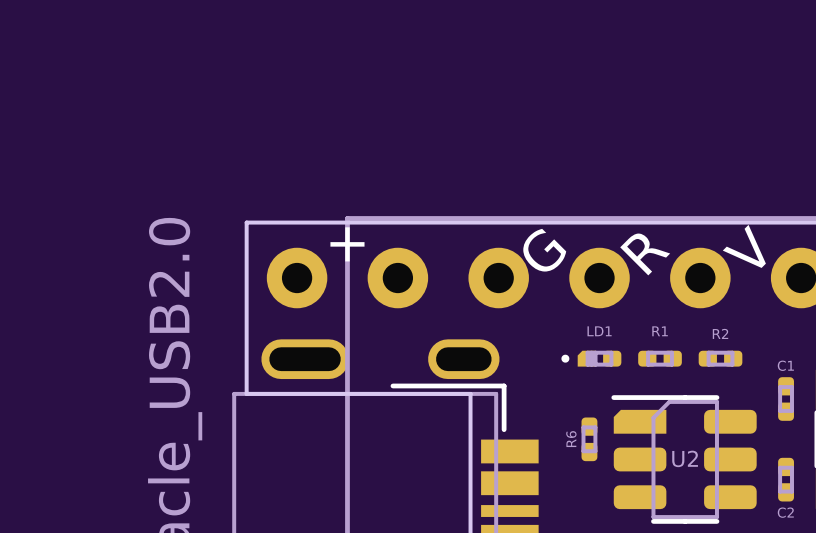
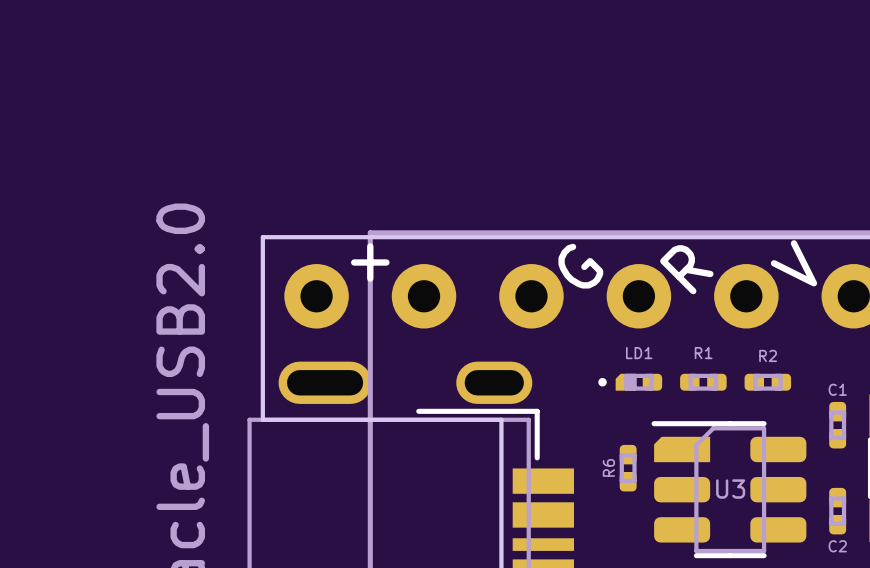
U2 name: U2 (685, 458) -> U3 (730, 489)

